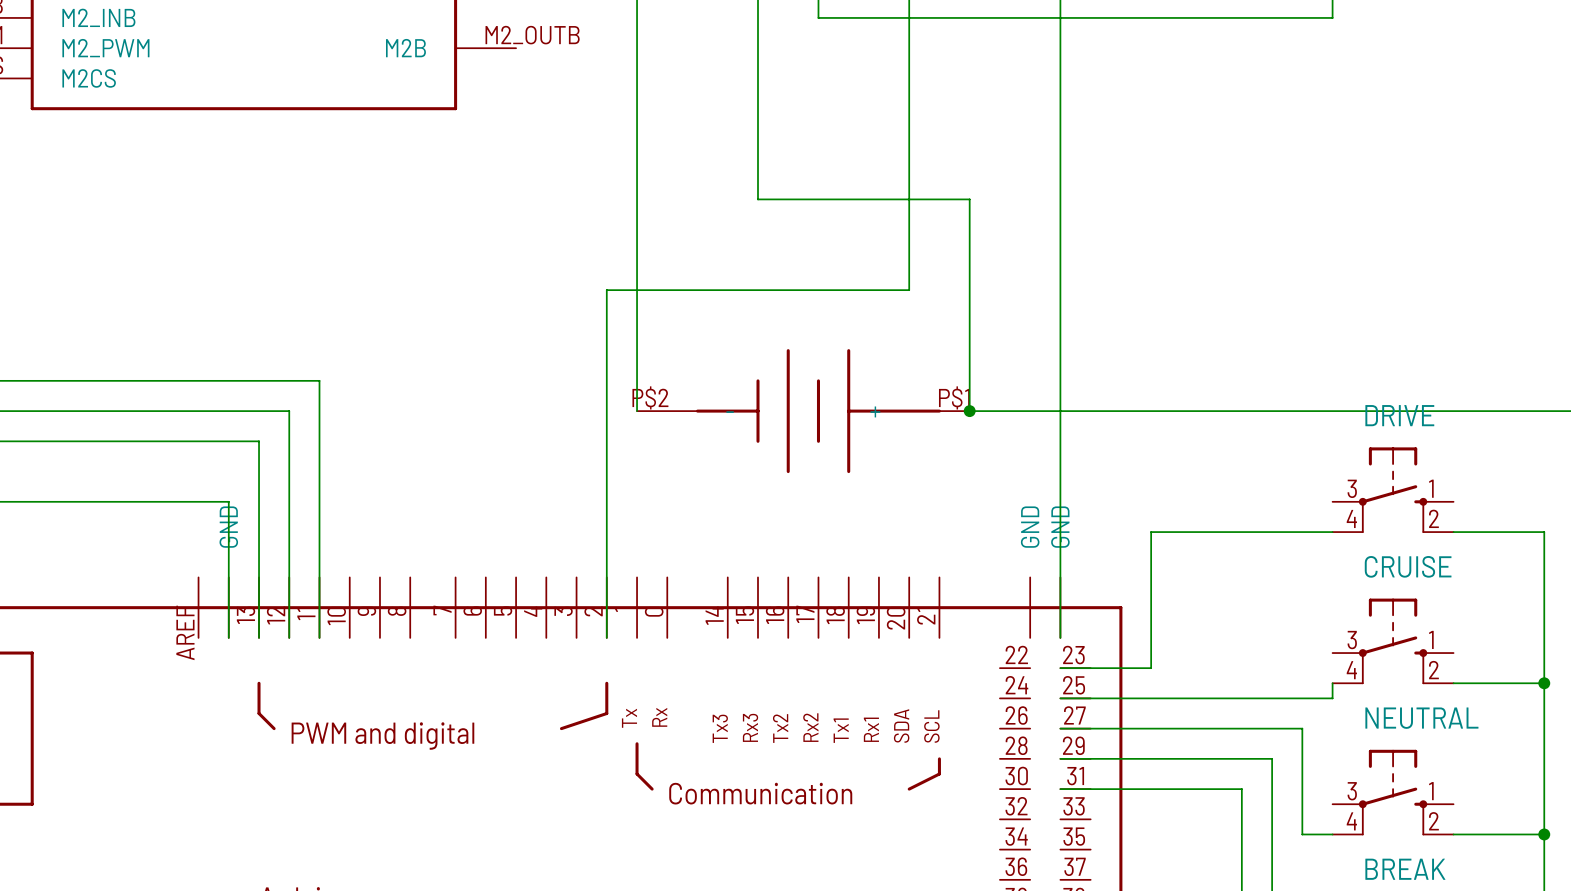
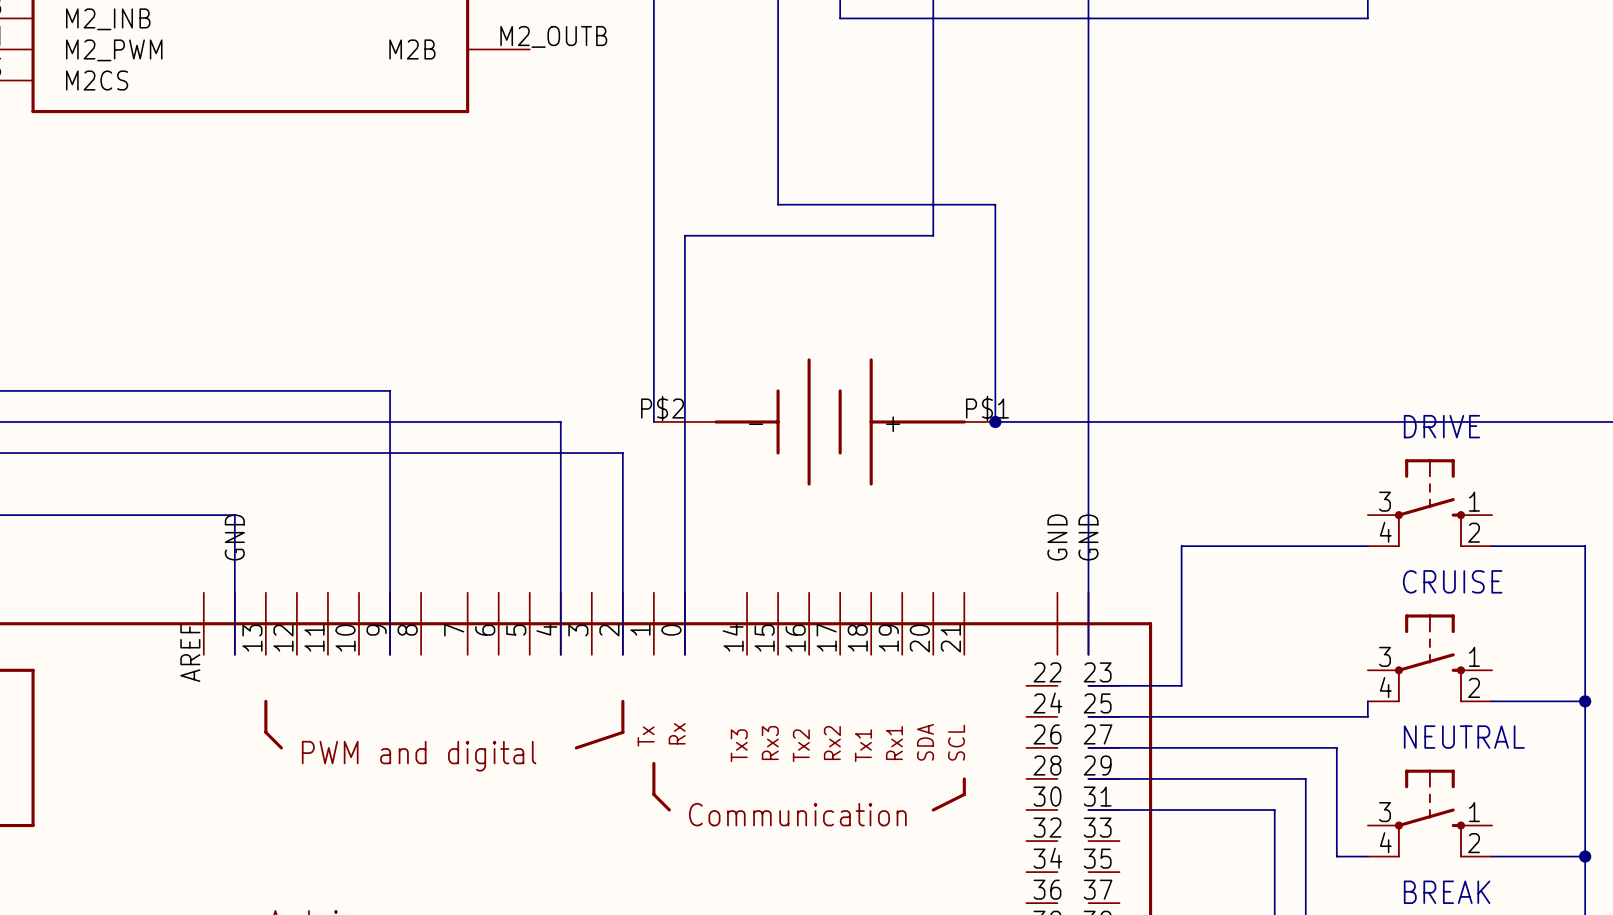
wire: (909, 229) (909, 290) (606, 290) (606, 441) -> (933, 235) (684, 235) (684, 654)
wire: (319, 380) (319, 637) -> (327, 390) (390, 390) (390, 654)
wire: (289, 411) (289, 637) -> (296, 421) (560, 421) (560, 654)
wire: (259, 441) (259, 637) -> (265, 453) (622, 453)

